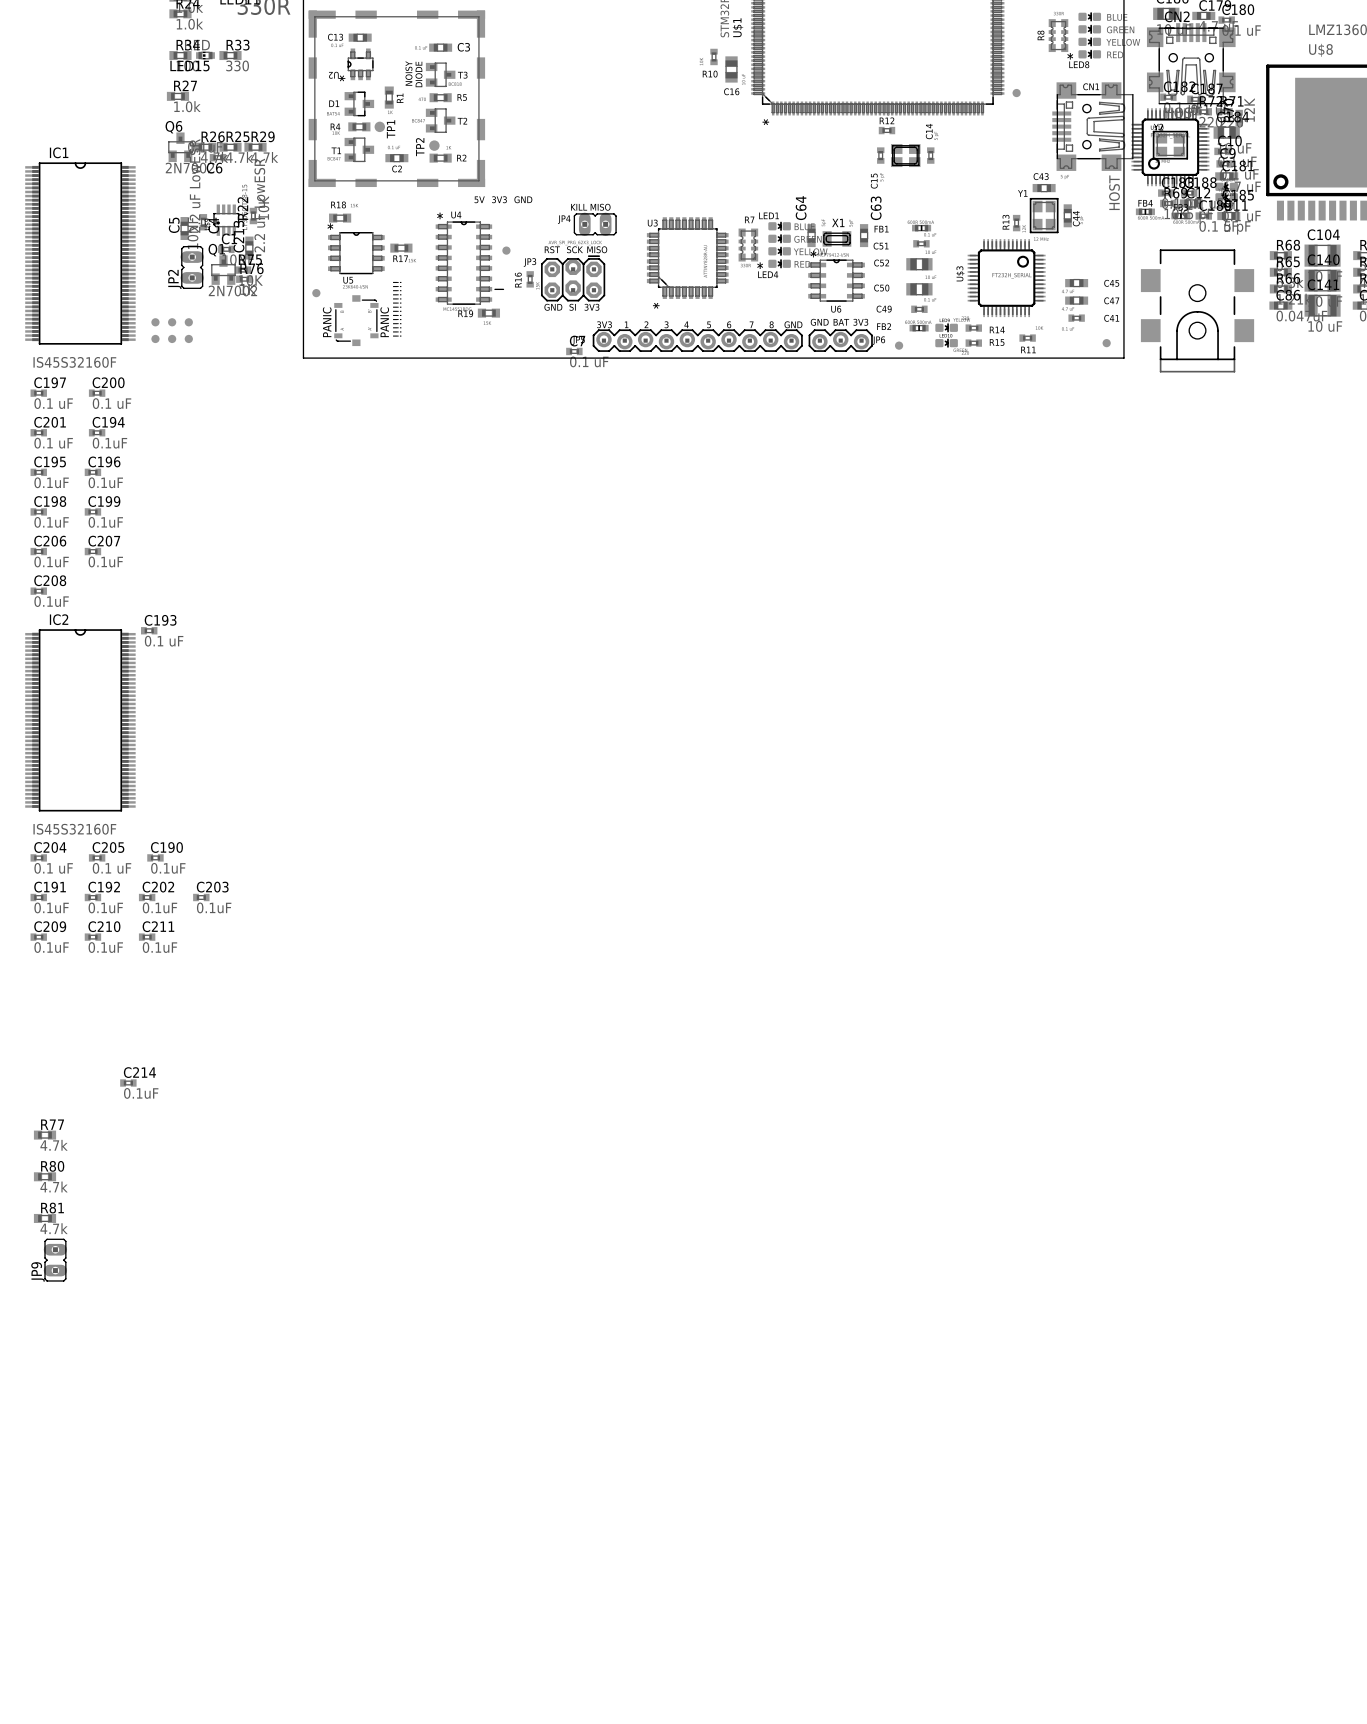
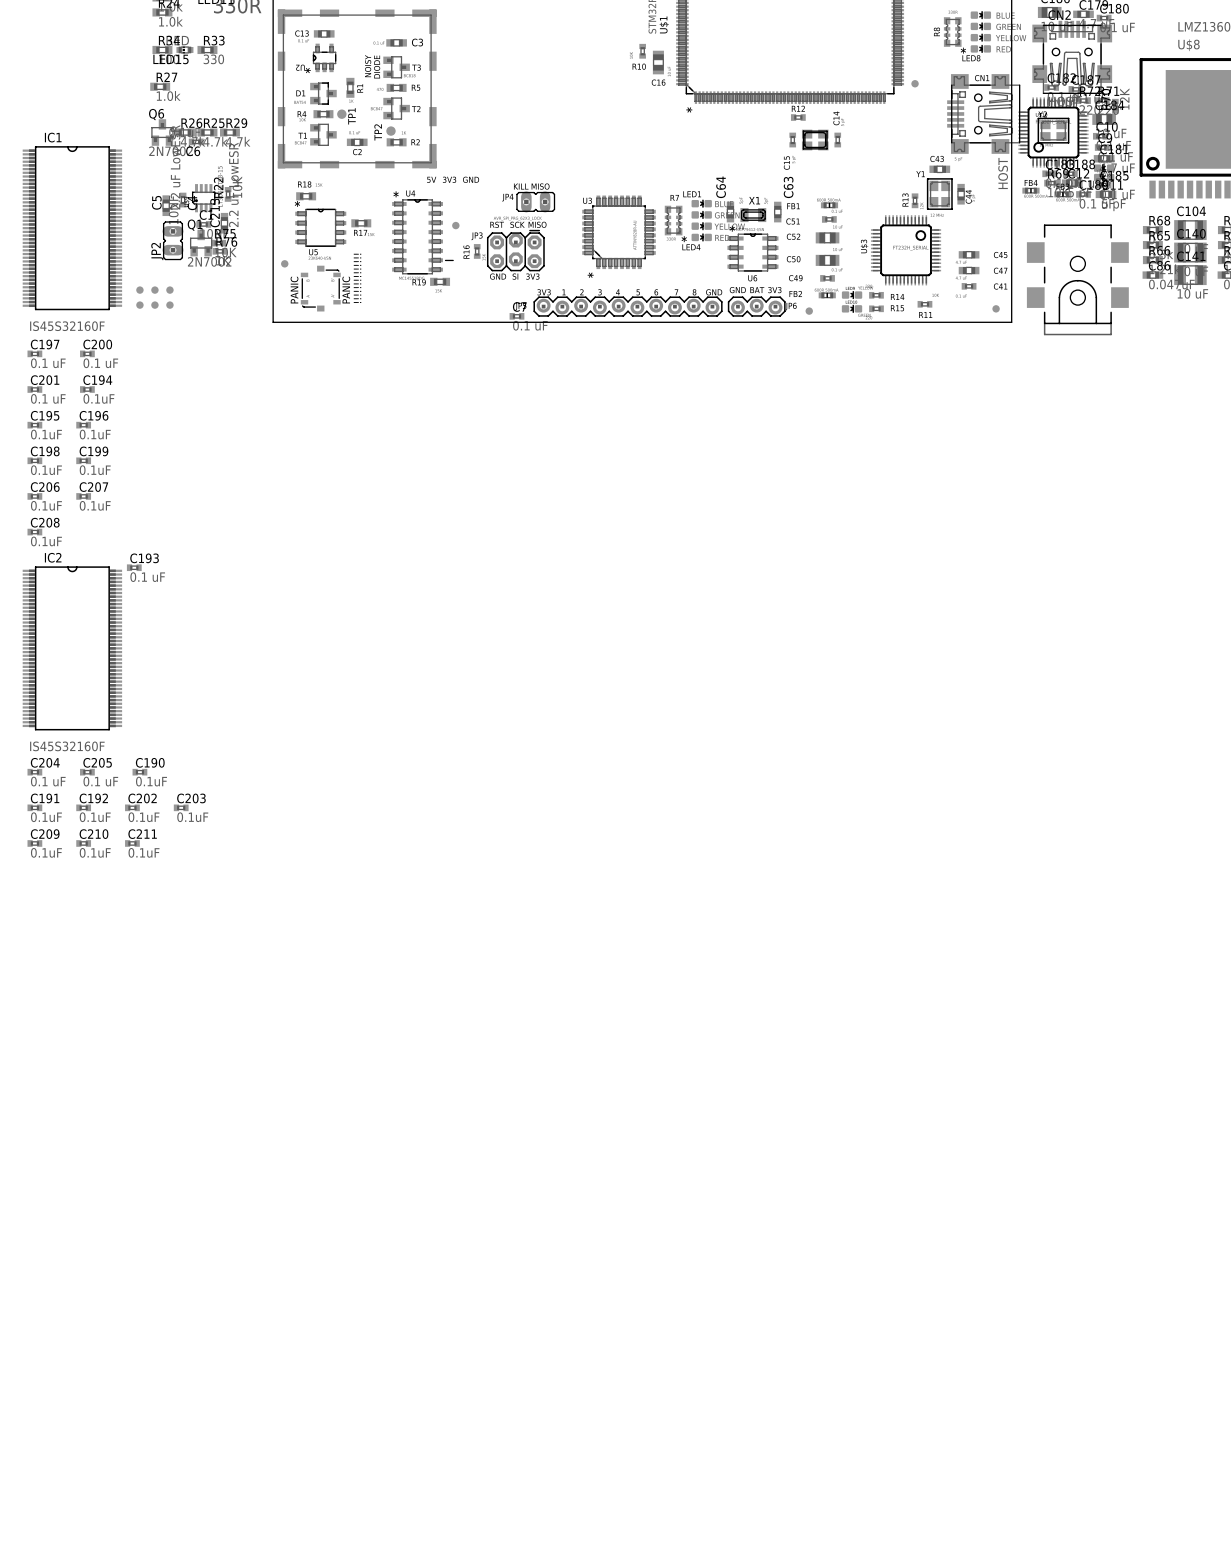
C214: 0.1uF (128, 1083) -> none
R77: 4.7k (45, 1135) -> none
R80: 4.7k (45, 1176) -> none
R81: 4.7k (45, 1218) -> none
JP9: (55, 1260) -> none

